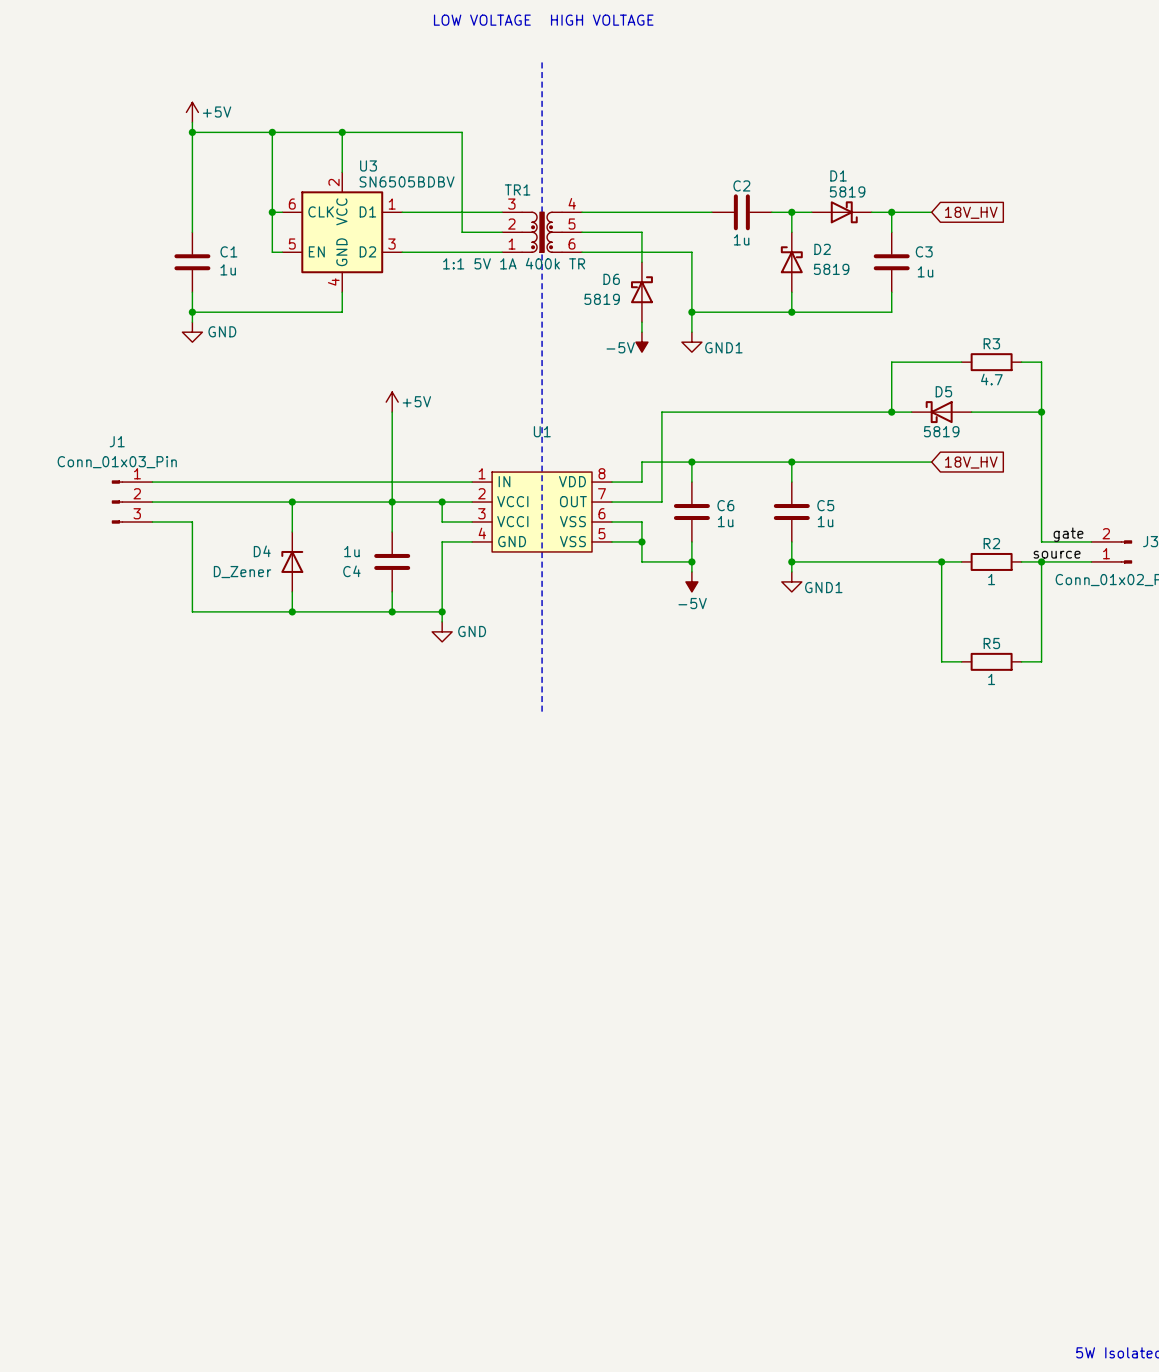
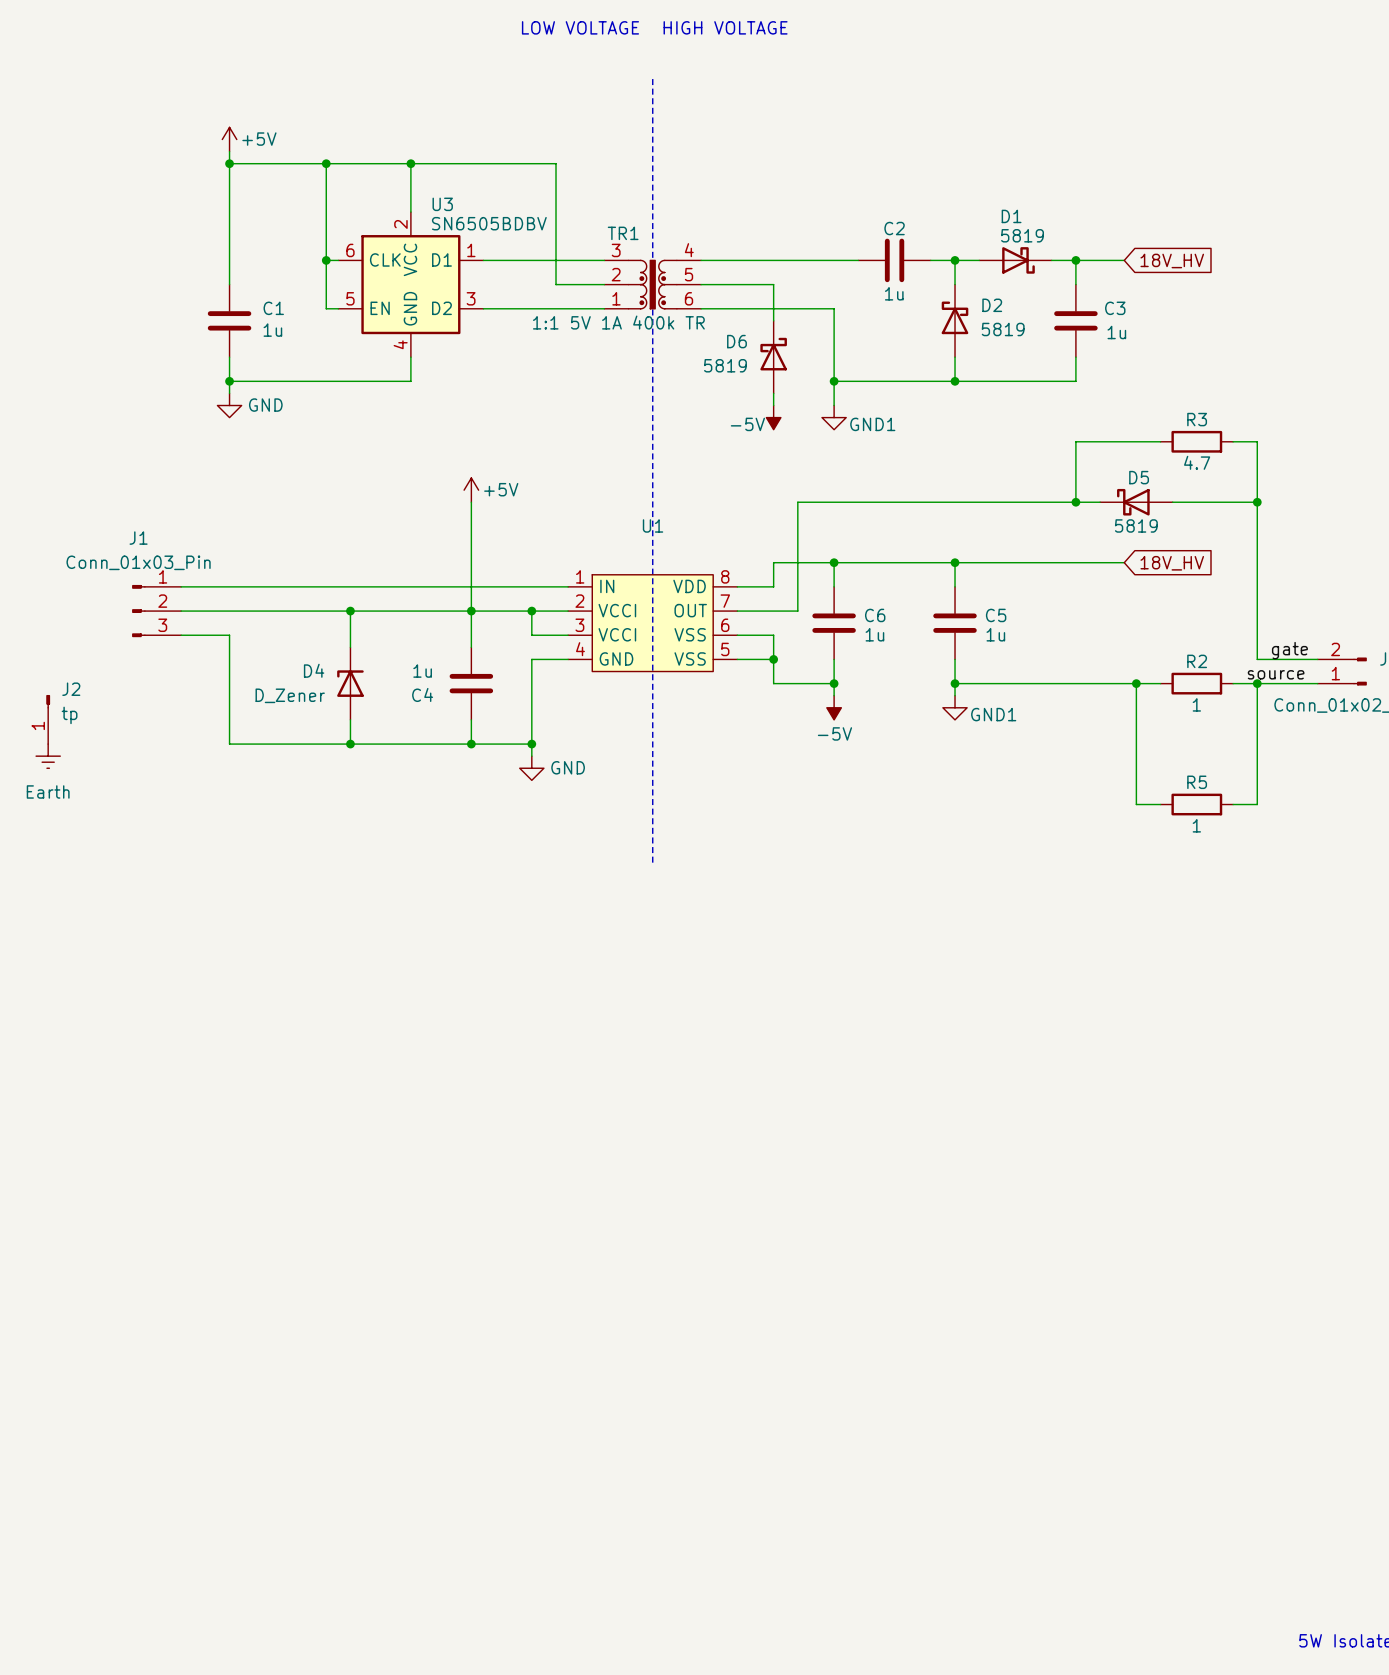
J2: none -> tp (48, 719)
power symbol: none -> Earth (48, 756)

